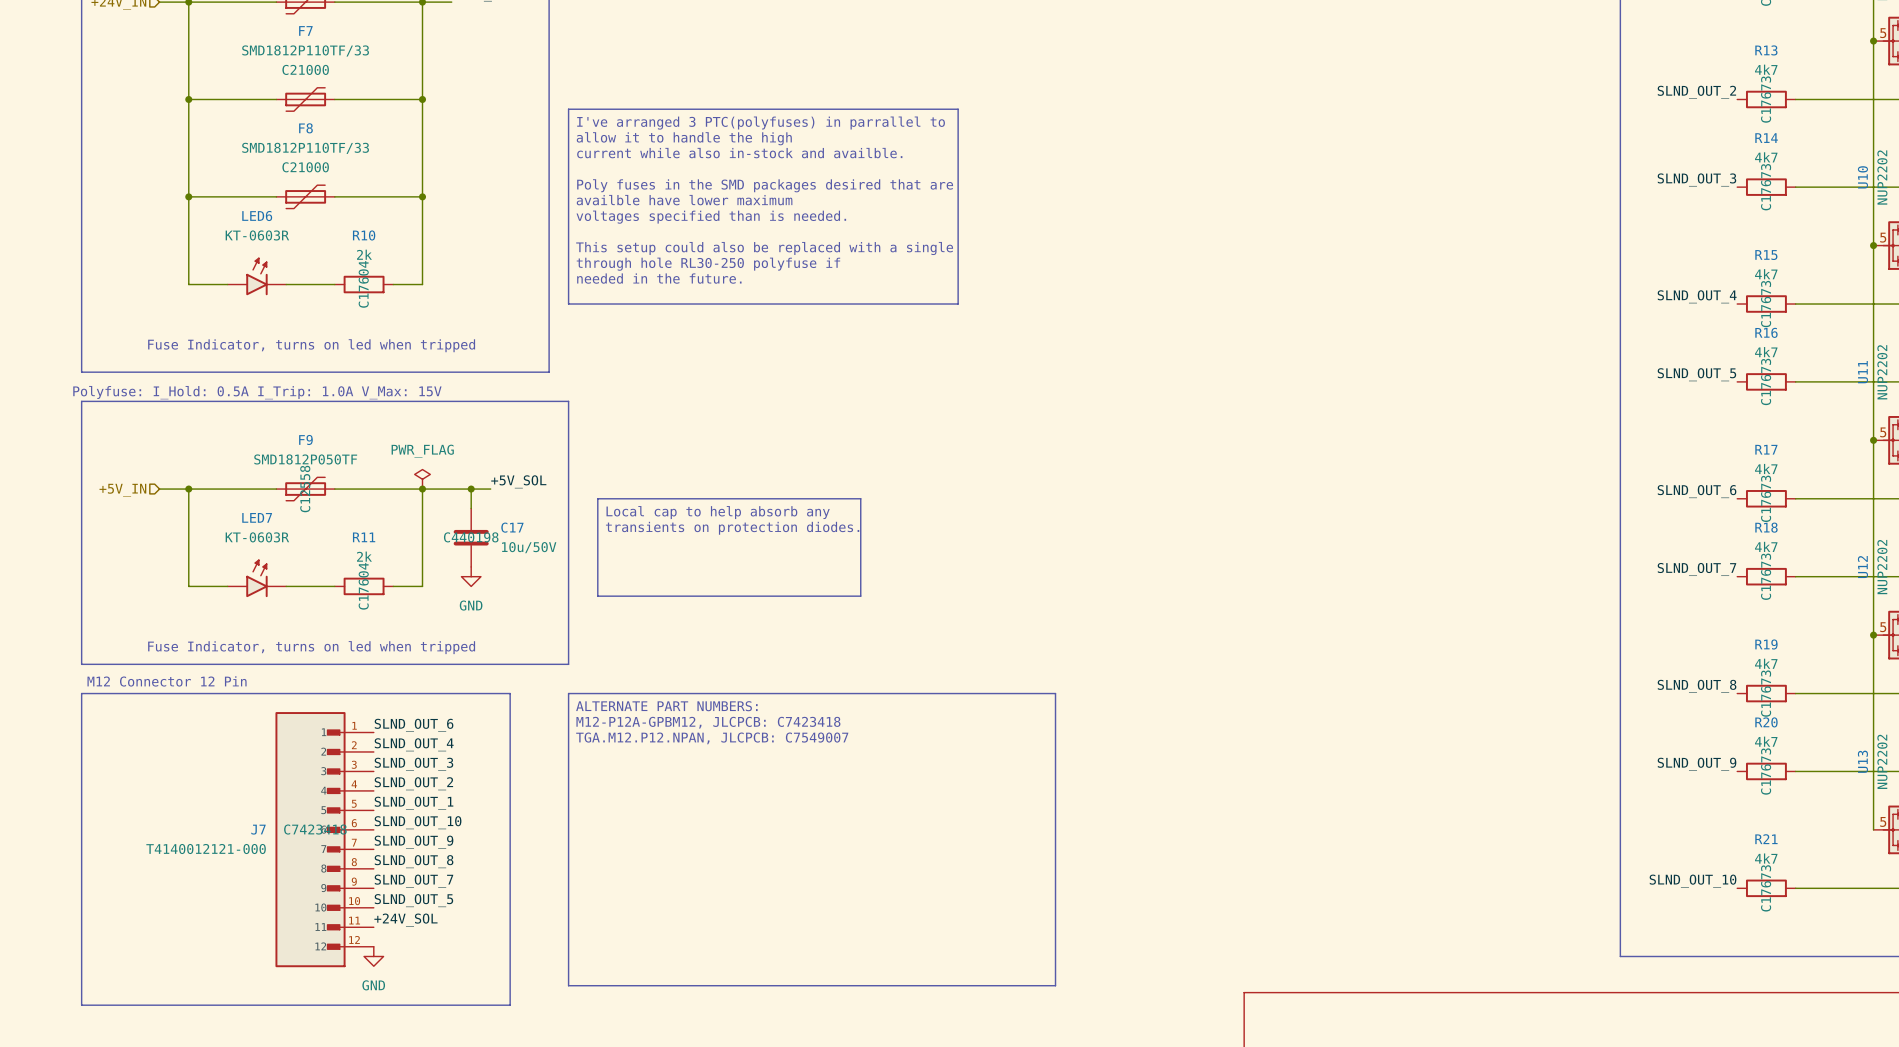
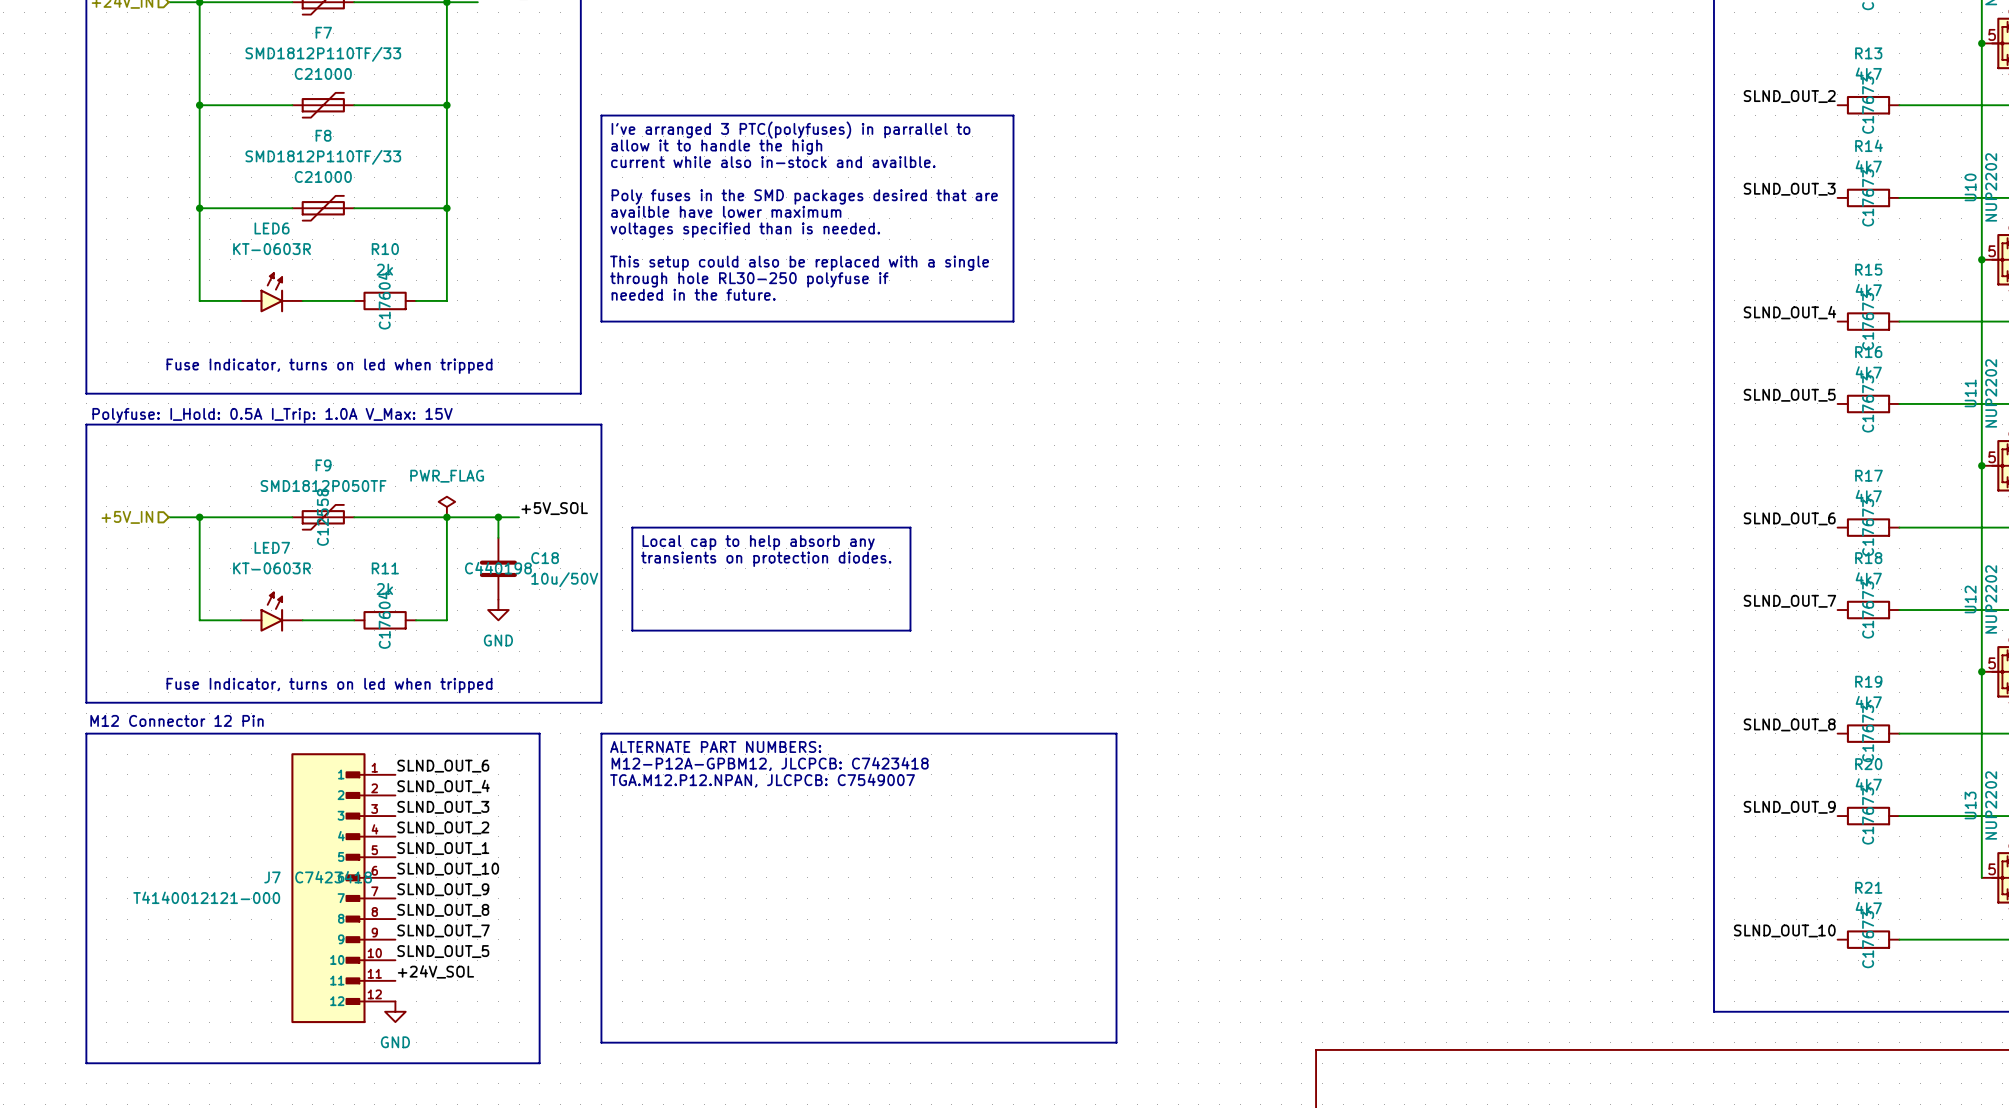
C17 name: C17 (512, 527) -> C18 (545, 558)

